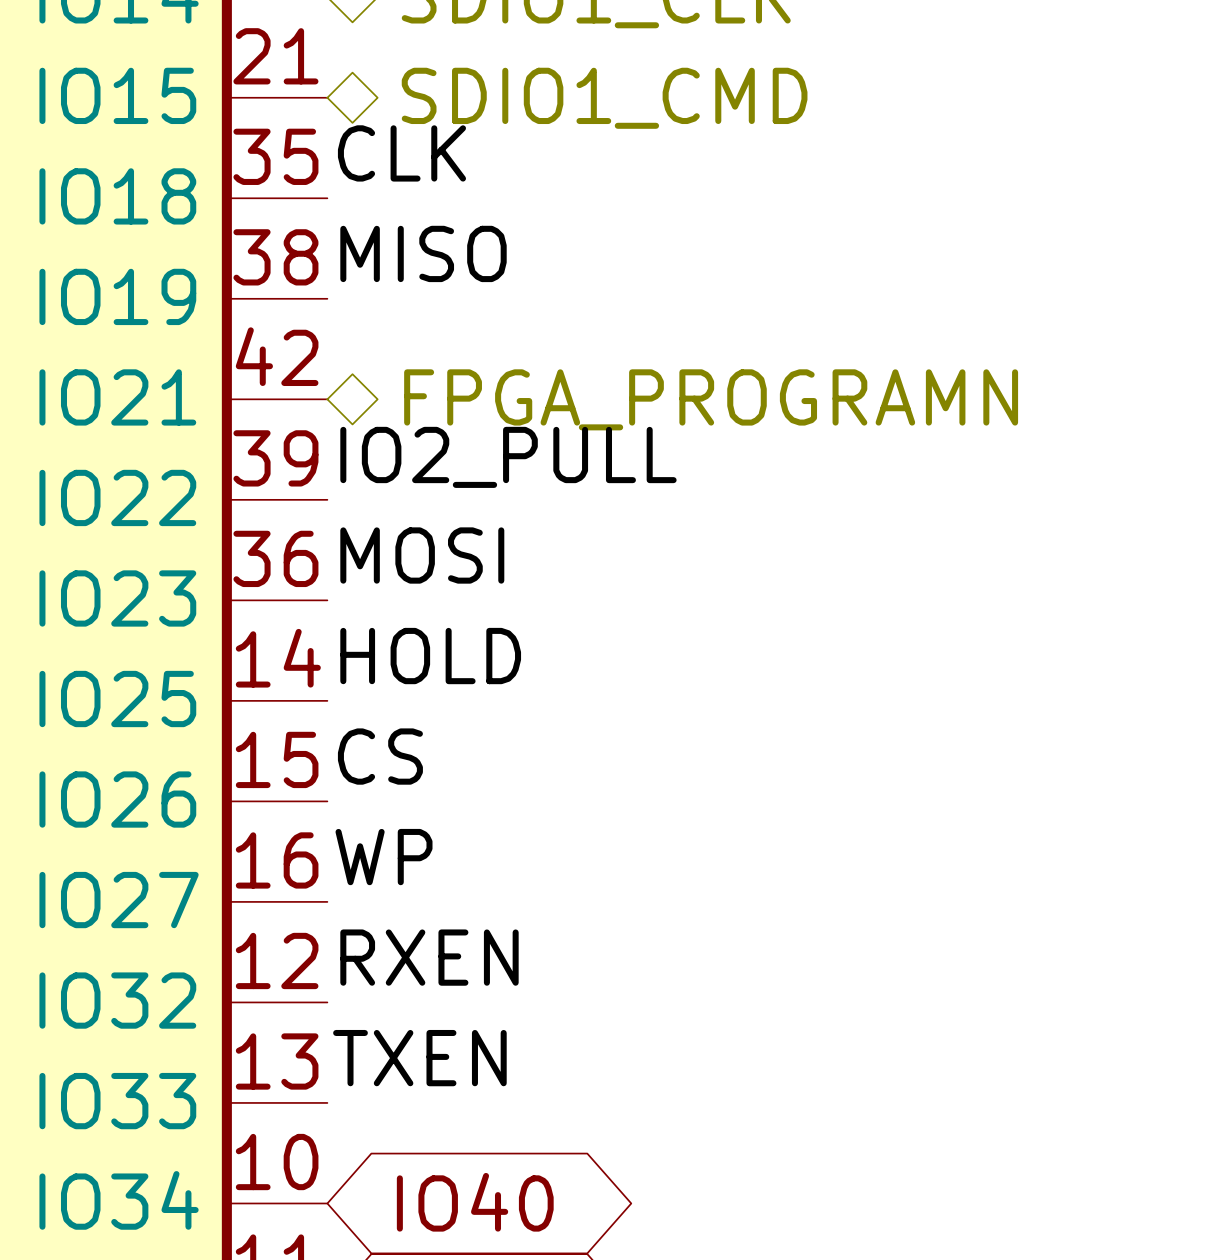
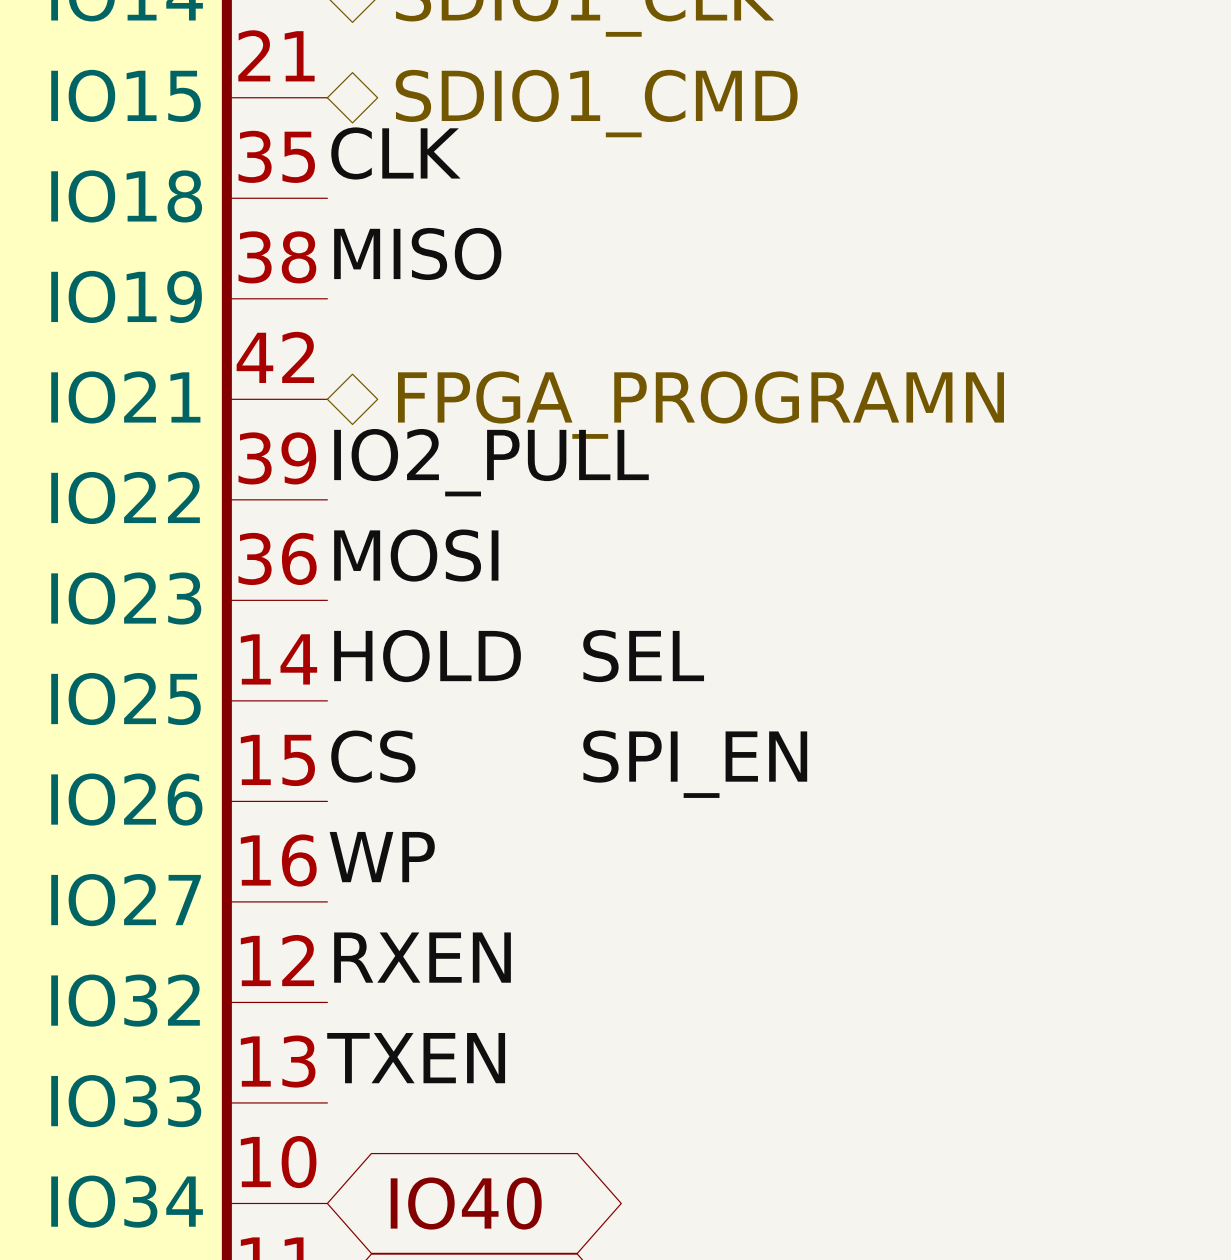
label: none -> SEL (643, 656)
label: none -> SPI_EN (695, 764)

